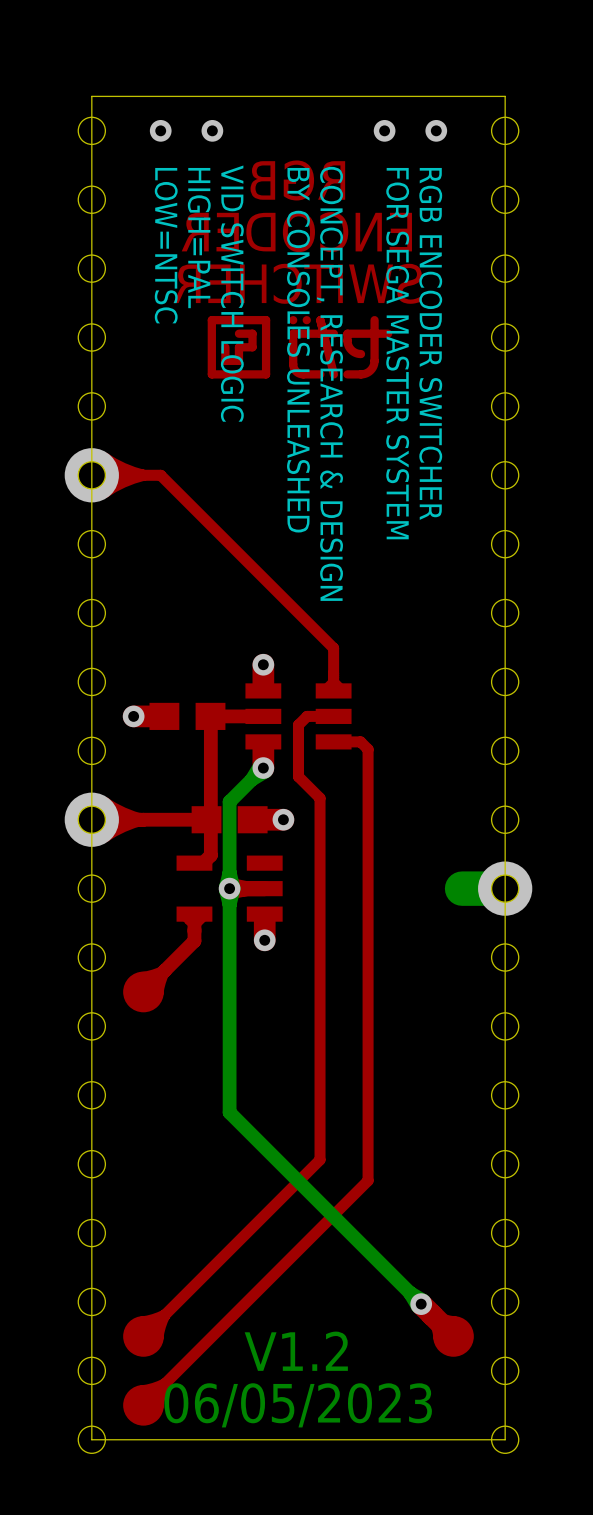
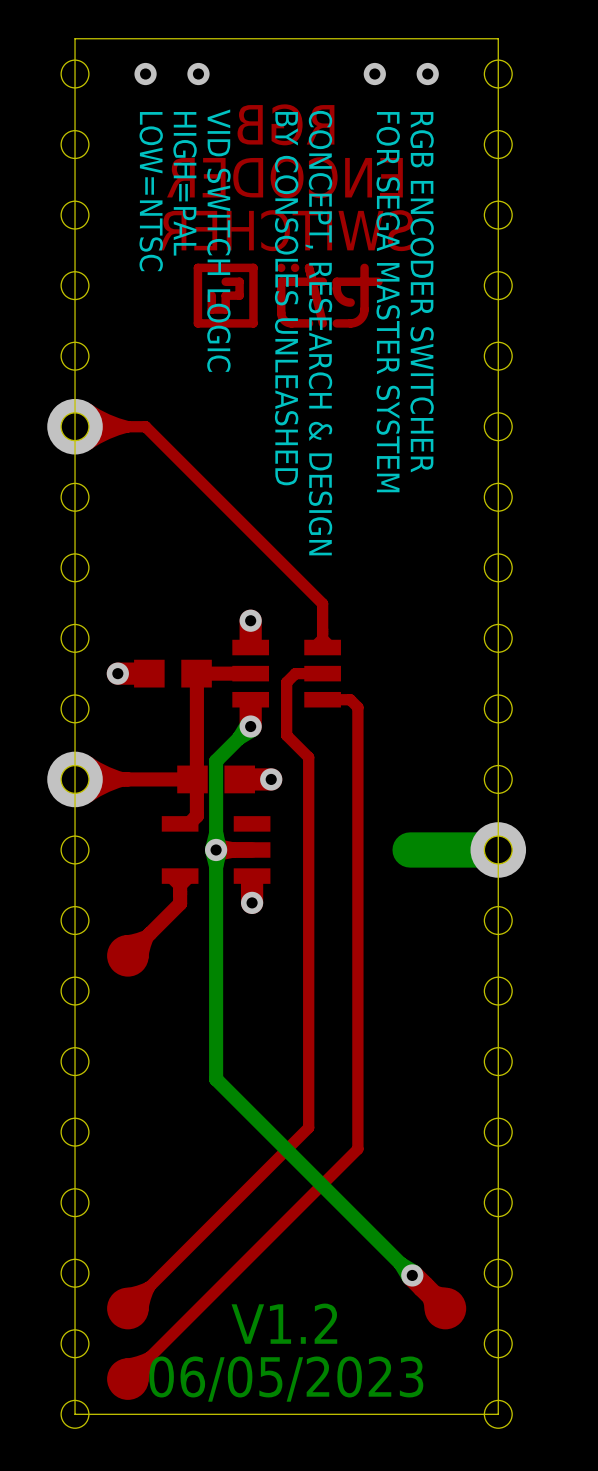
bottom track: none -> (454, 849) (410, 849)

